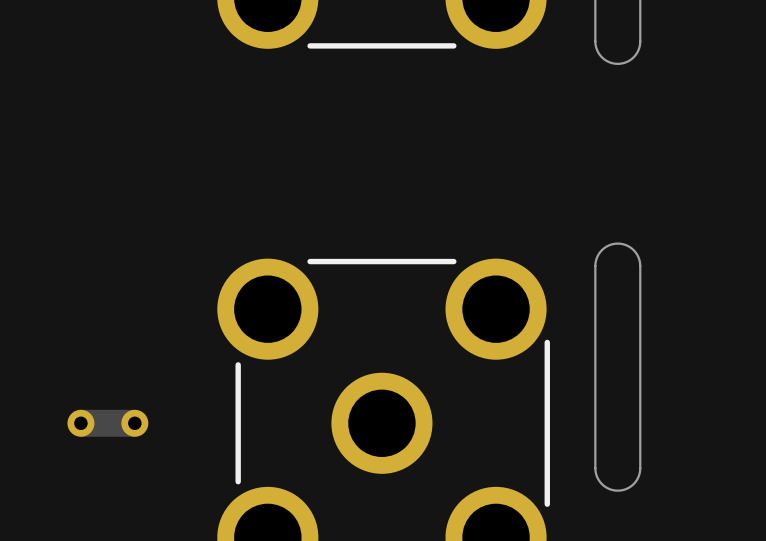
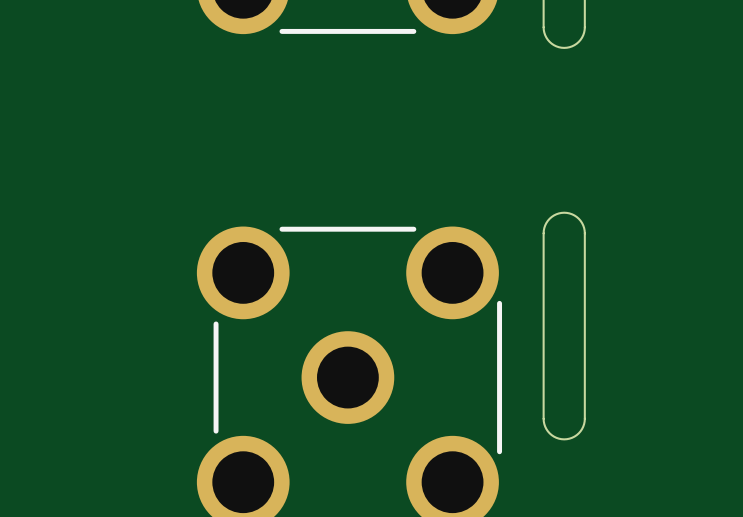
part: (107, 423) -> none

